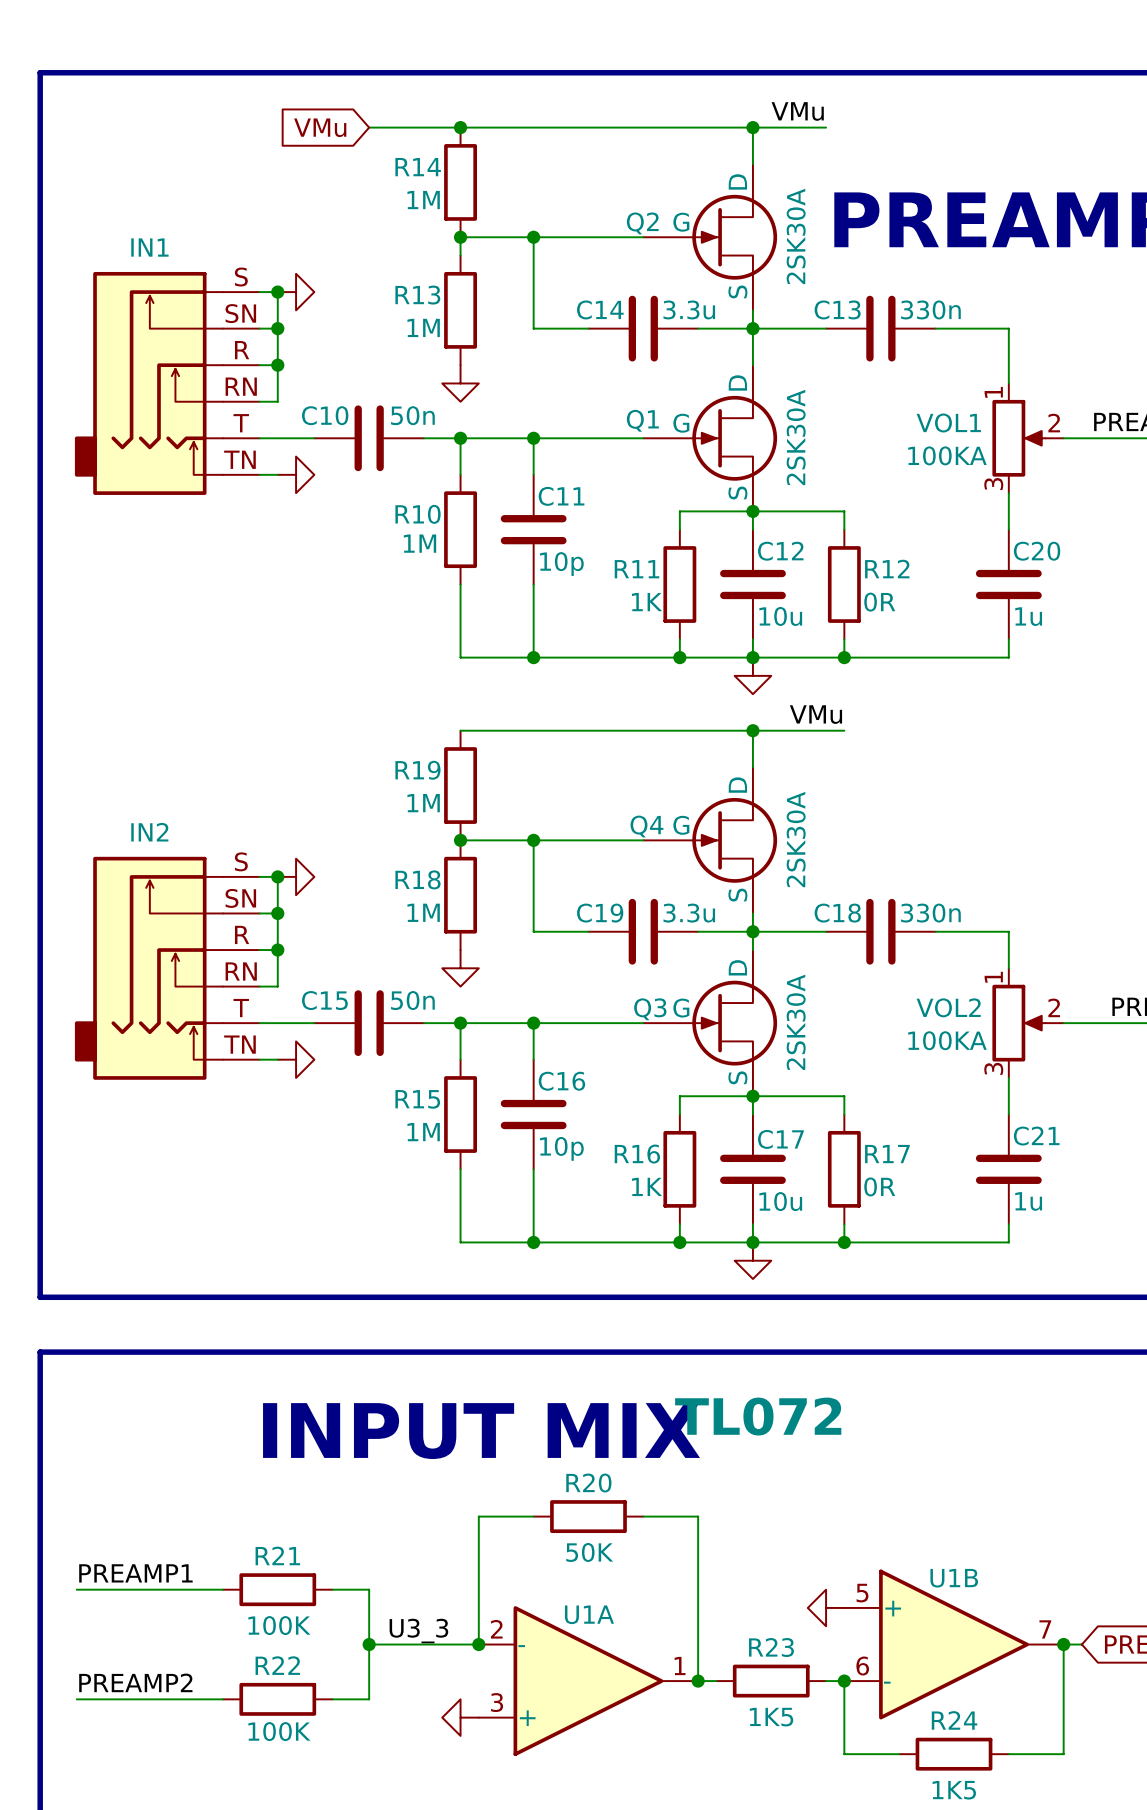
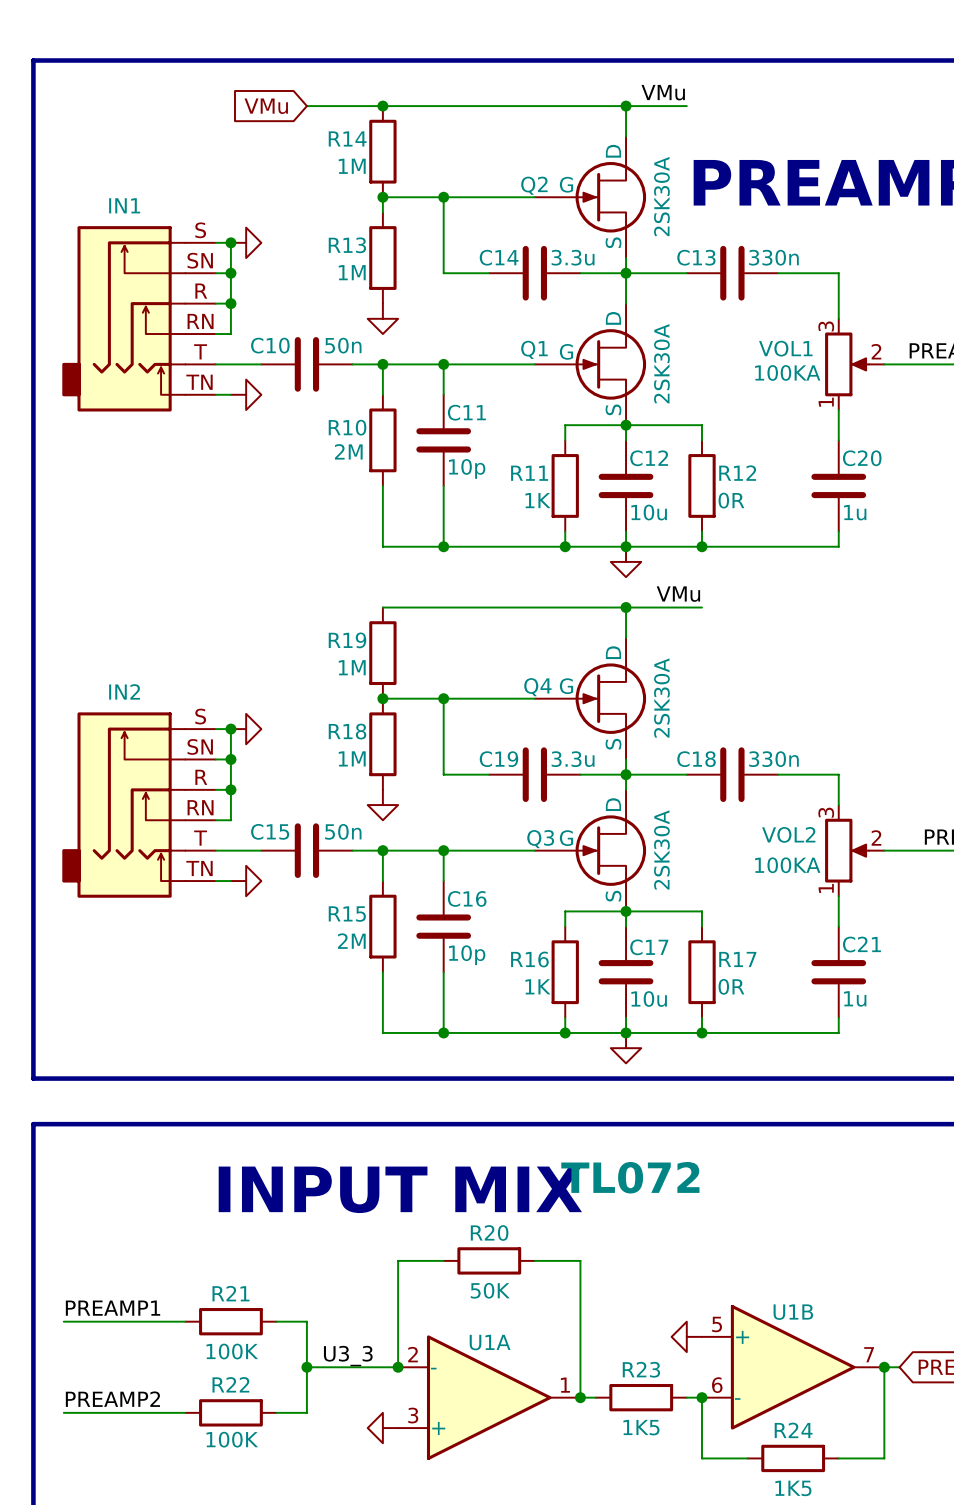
VOL1 flip: as is (1018, 438) -> up-down (847, 364)
R10 value: 1M (419, 543) -> 2M (348, 451)
VOL2 flip: as is (1018, 1023) -> up-down (847, 850)
R15 value: 1M (423, 1132) -> 2M (351, 941)

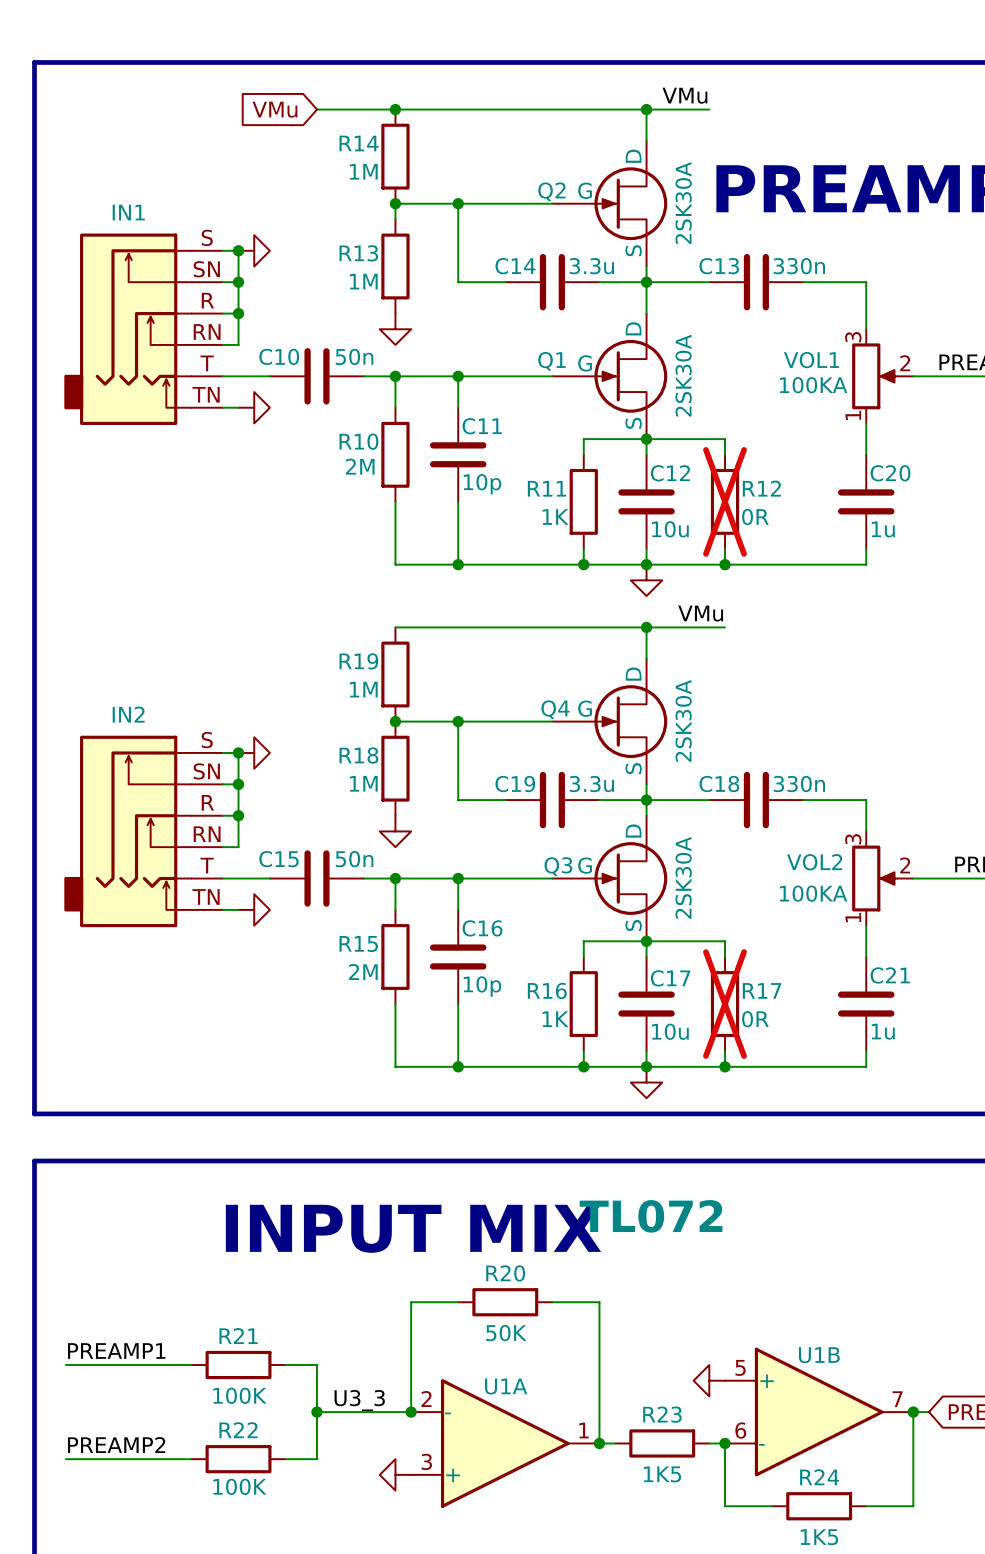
R12 do-not-place cross: none -> (725, 501)
R17 do-not-place cross: none -> (725, 1004)

